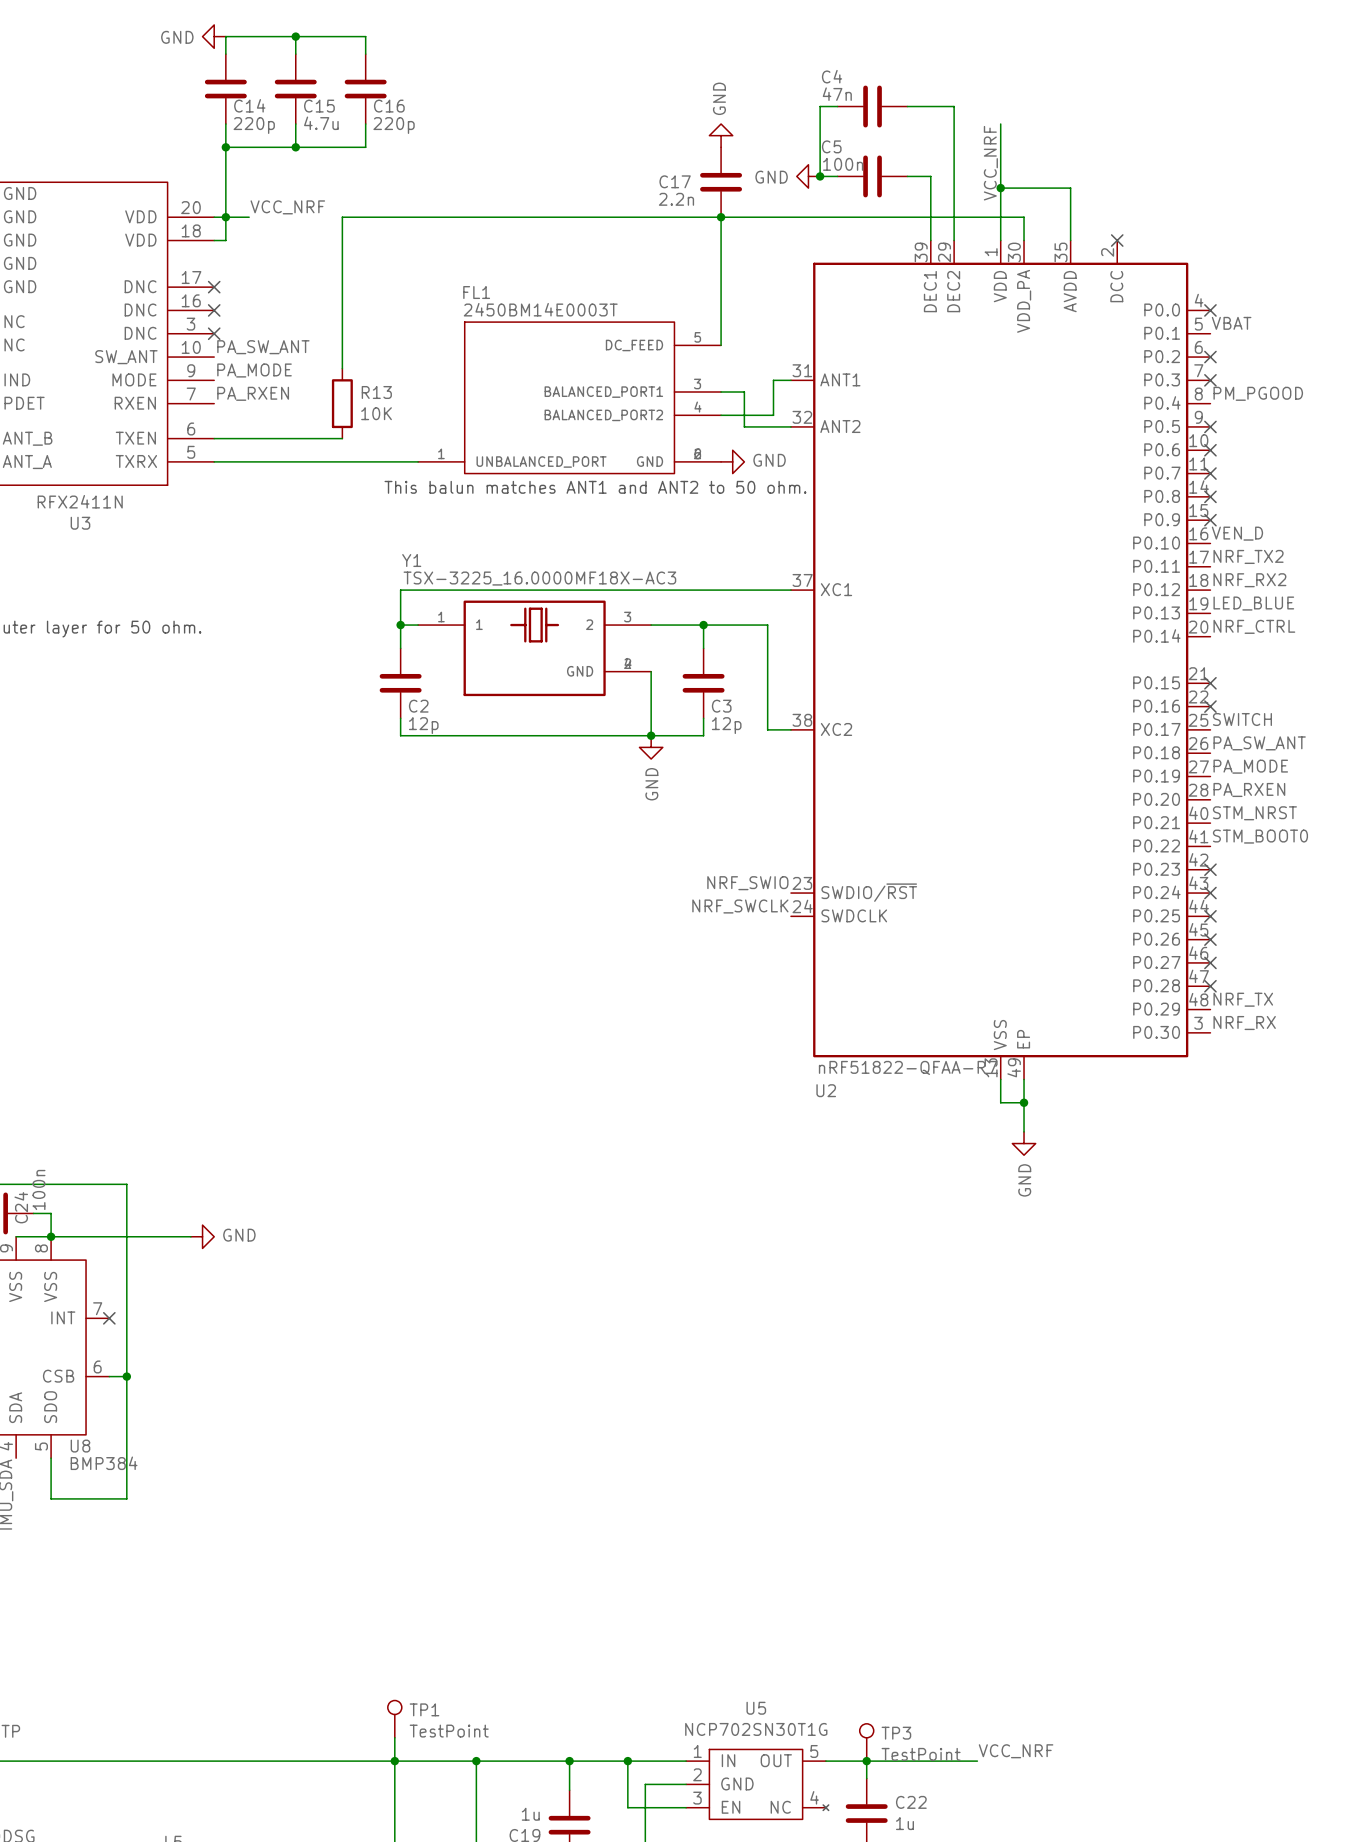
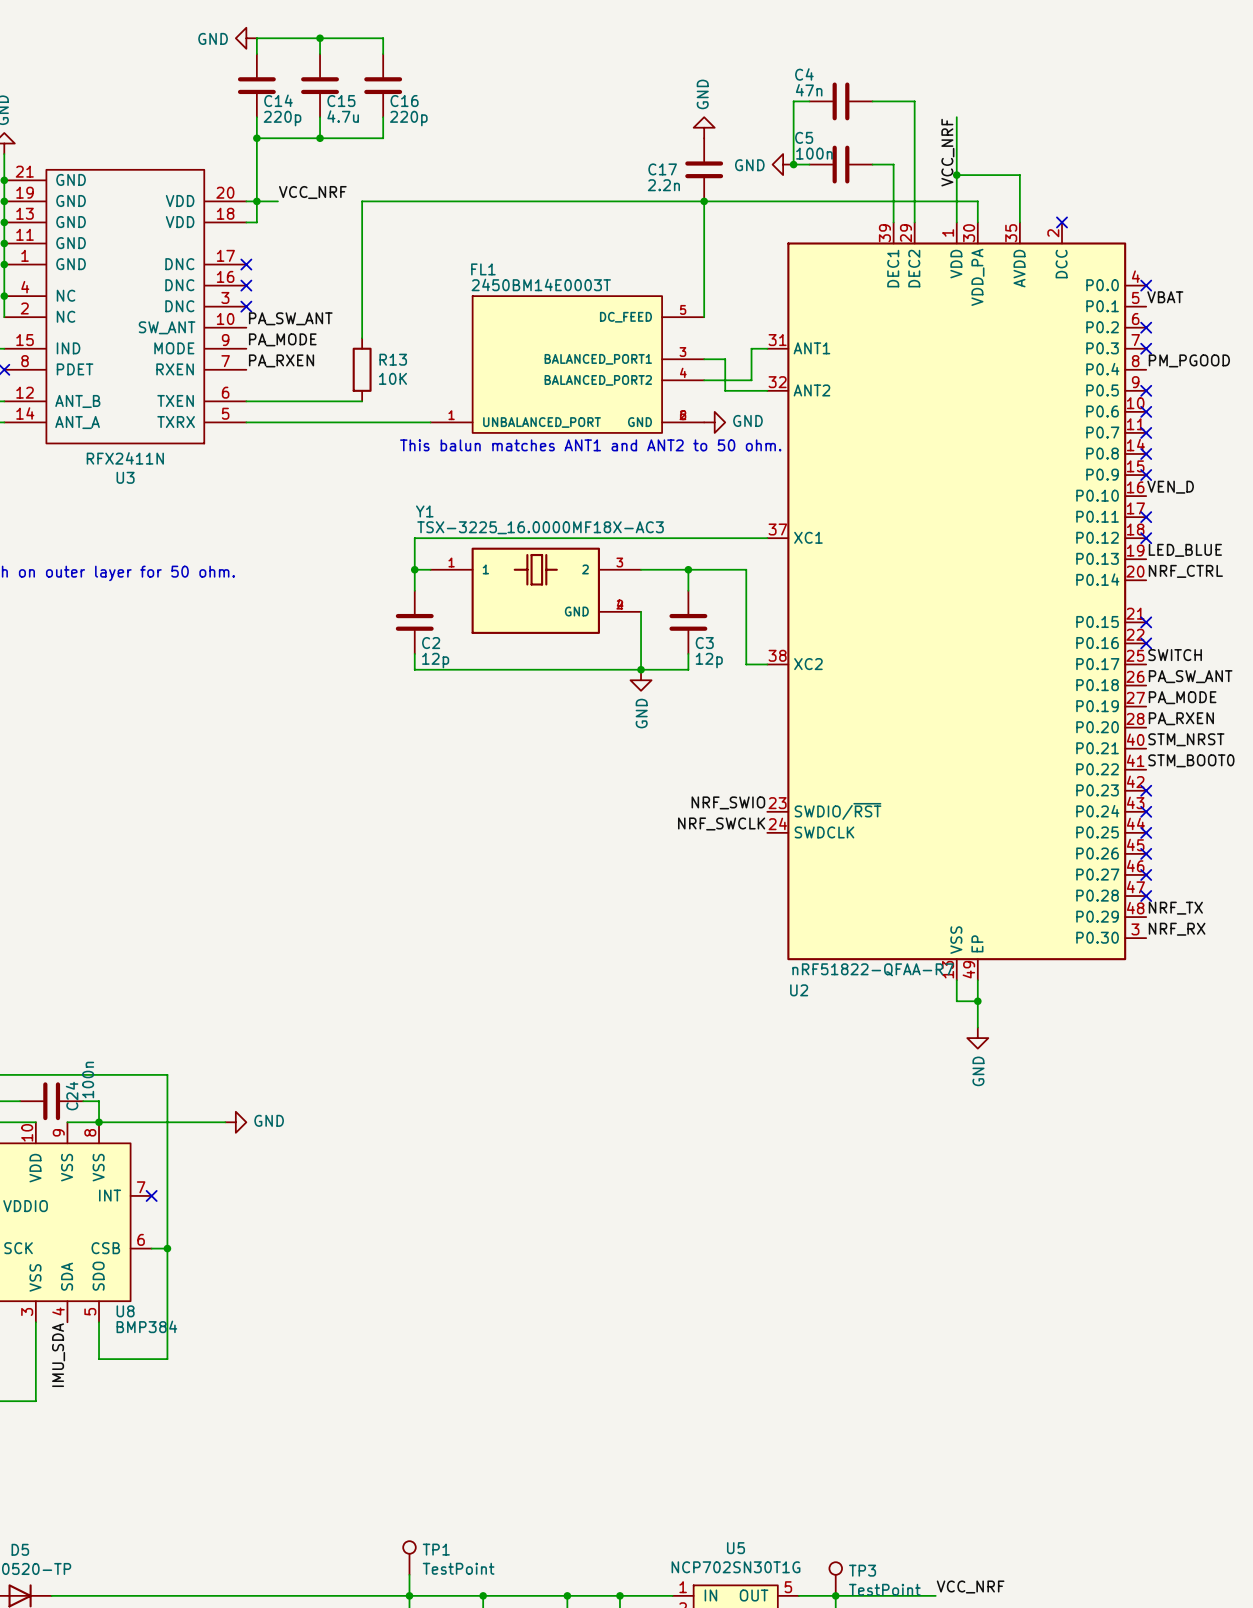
label: NRF_TX2 (1248, 556) -> none
no-connect mark: none -> (1146, 517)
label: NRF_RX2 (1249, 580) -> none
no-connect mark: none -> (1146, 538)

